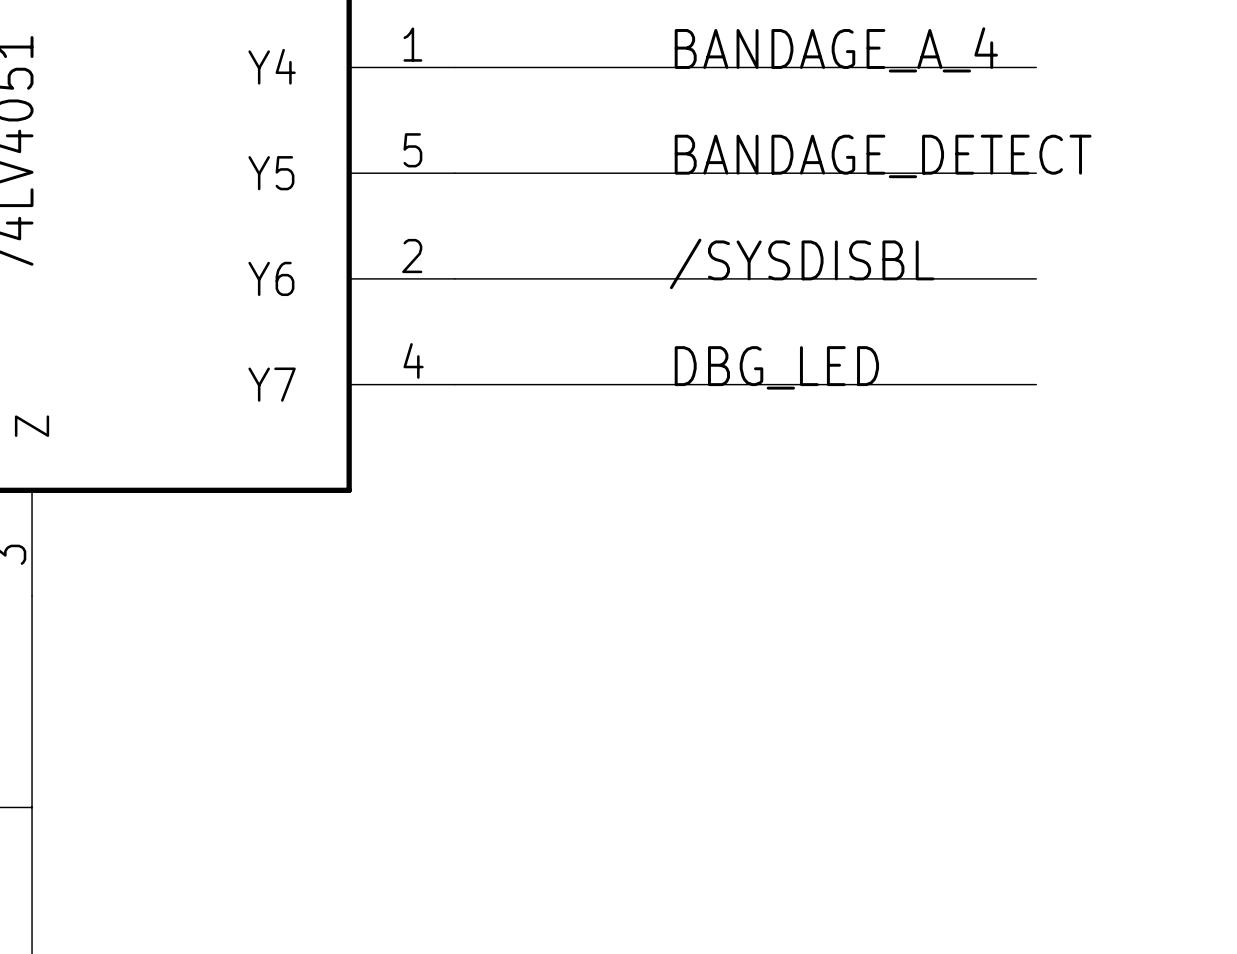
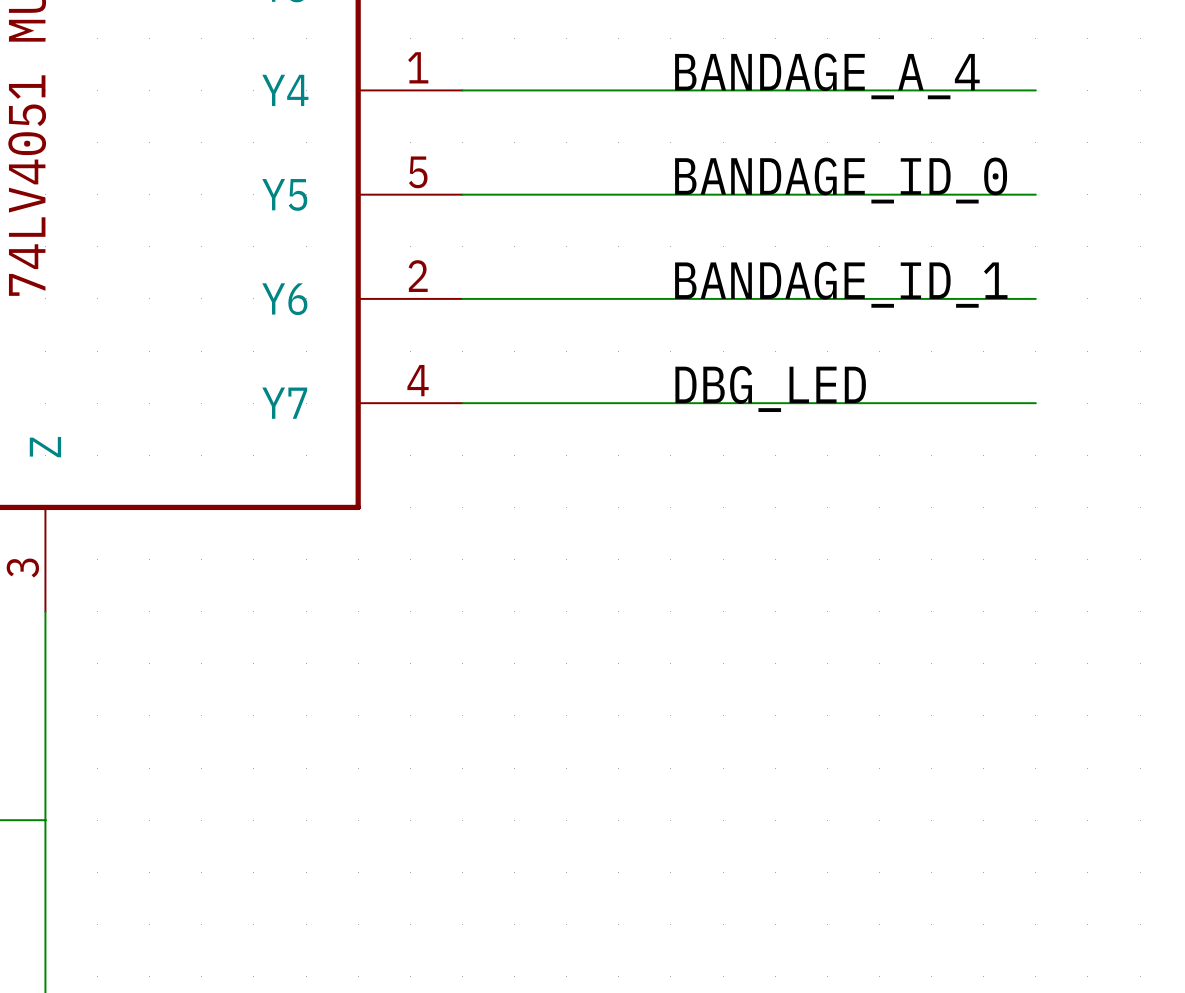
label: BANDAGE_DETECT (883, 156) -> BANDAGE_ID_0 (841, 180)
label: /SYSDISBL (802, 263) -> BANDAGE_ID_1 (841, 284)

